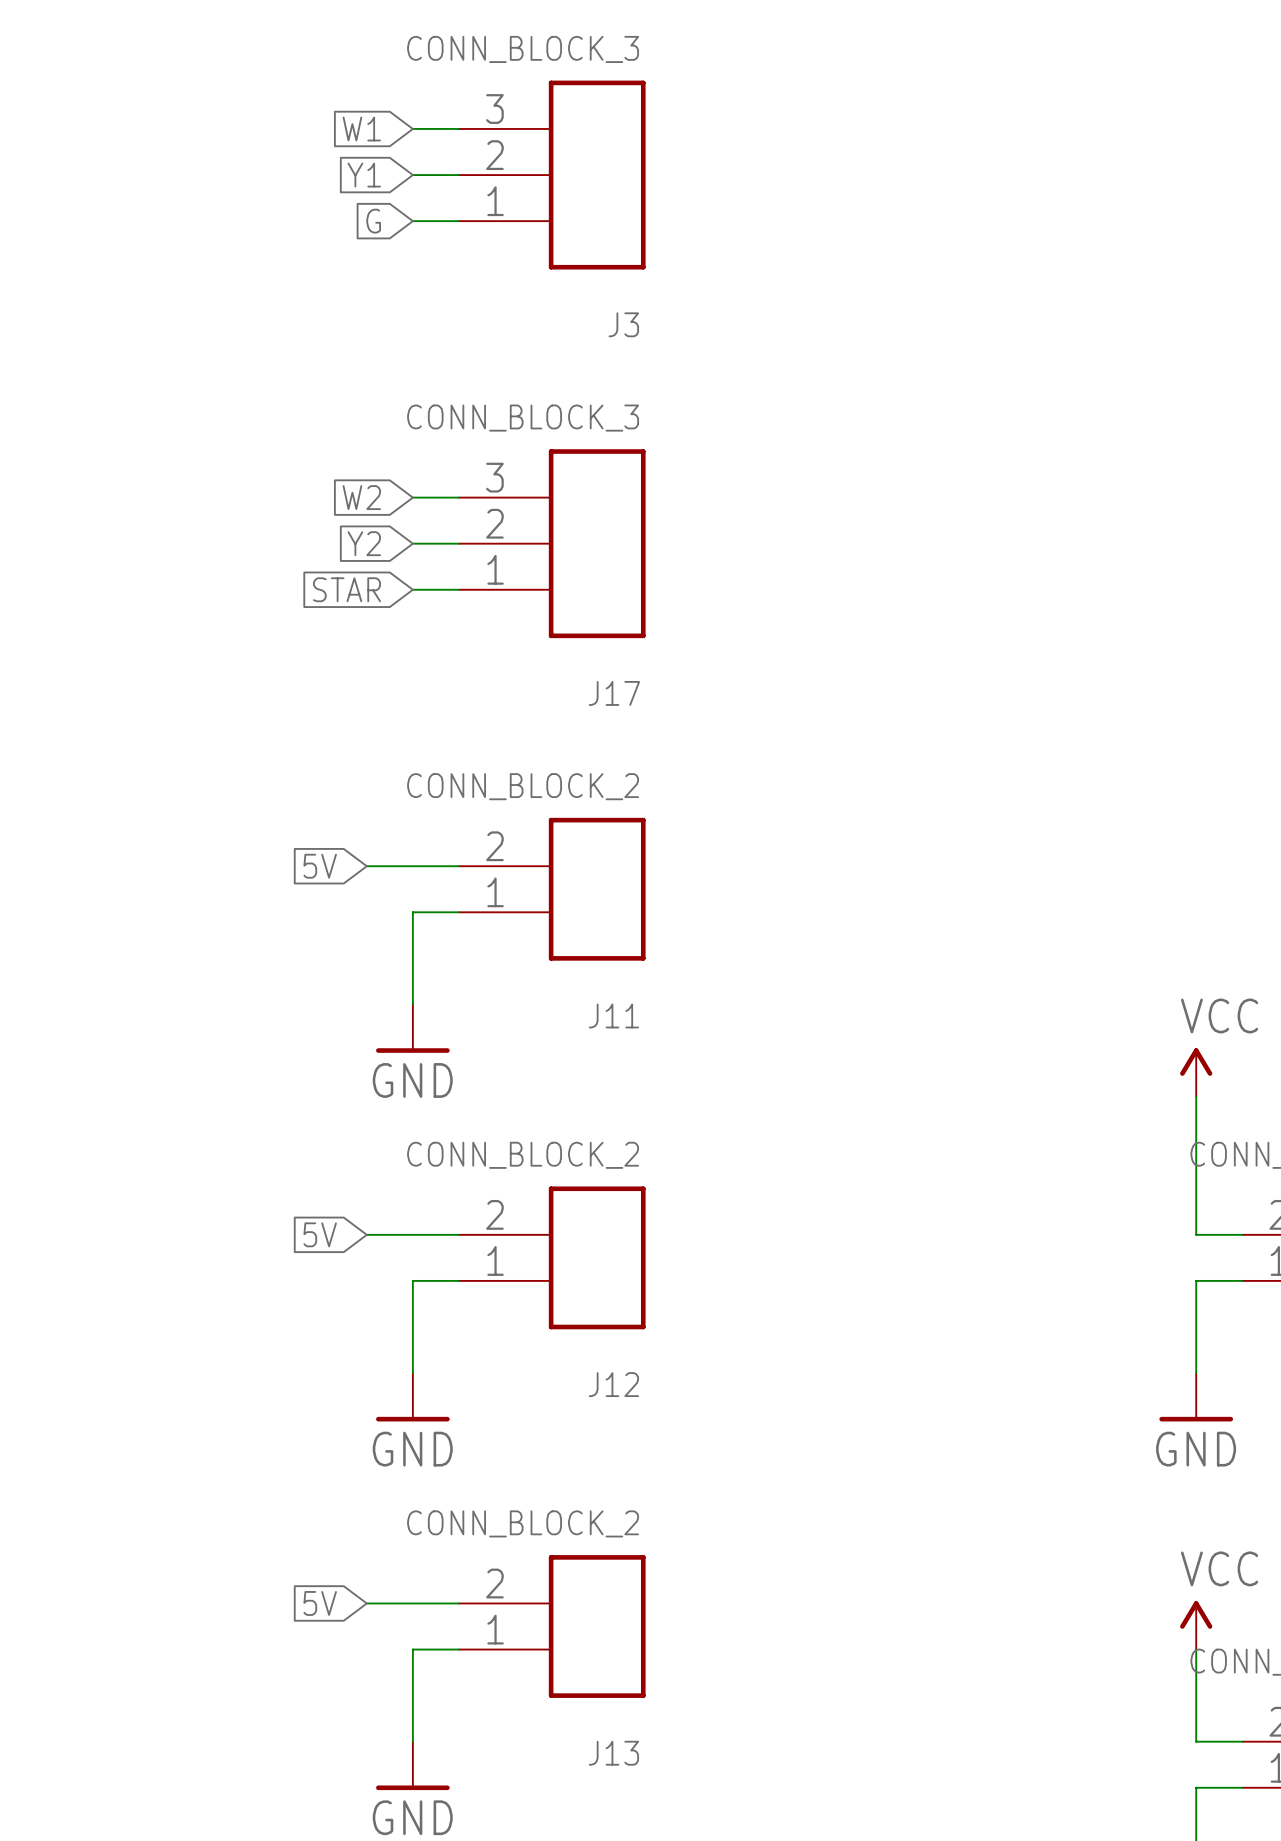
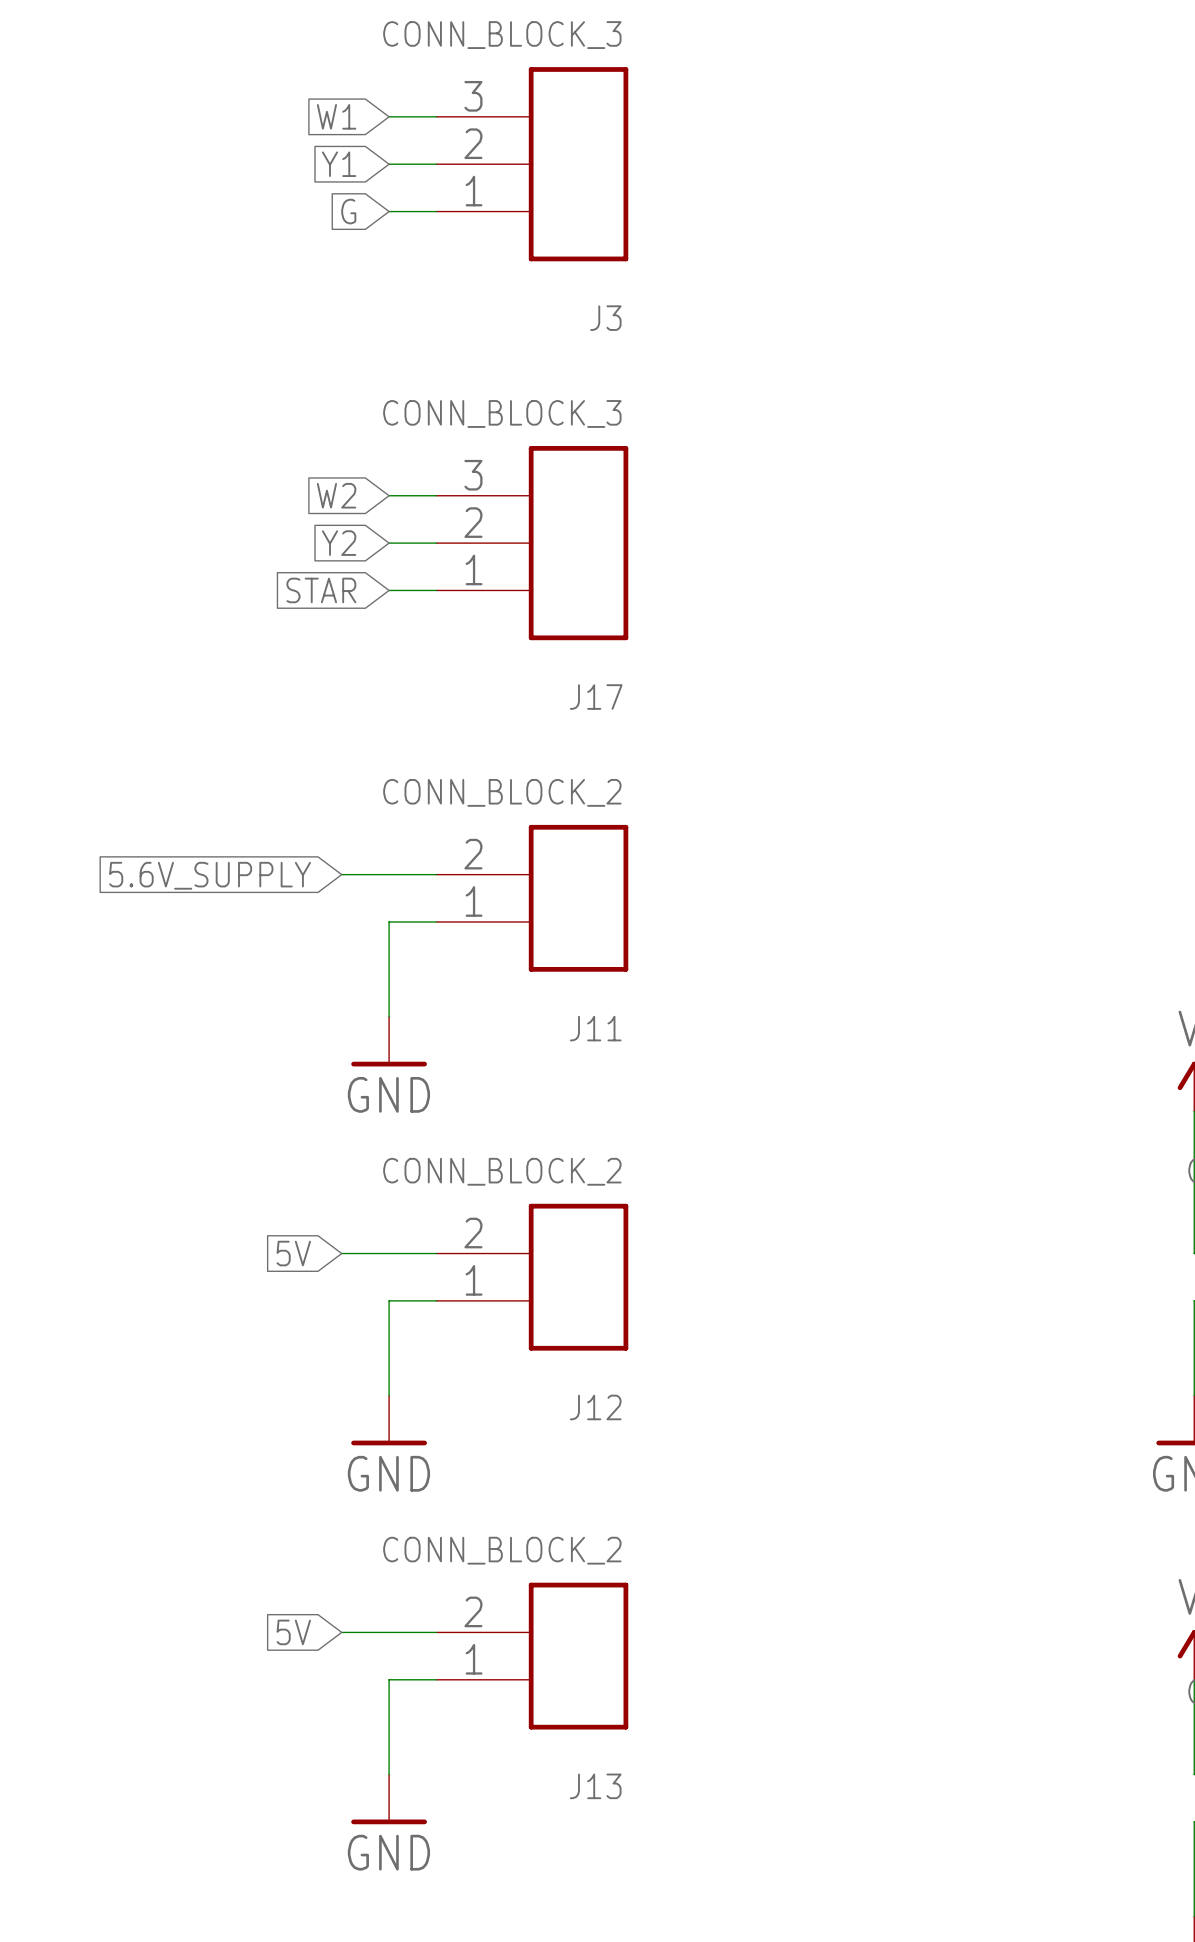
global label: 5V (320, 866) -> 5.6V_SUPPLY (210, 875)

